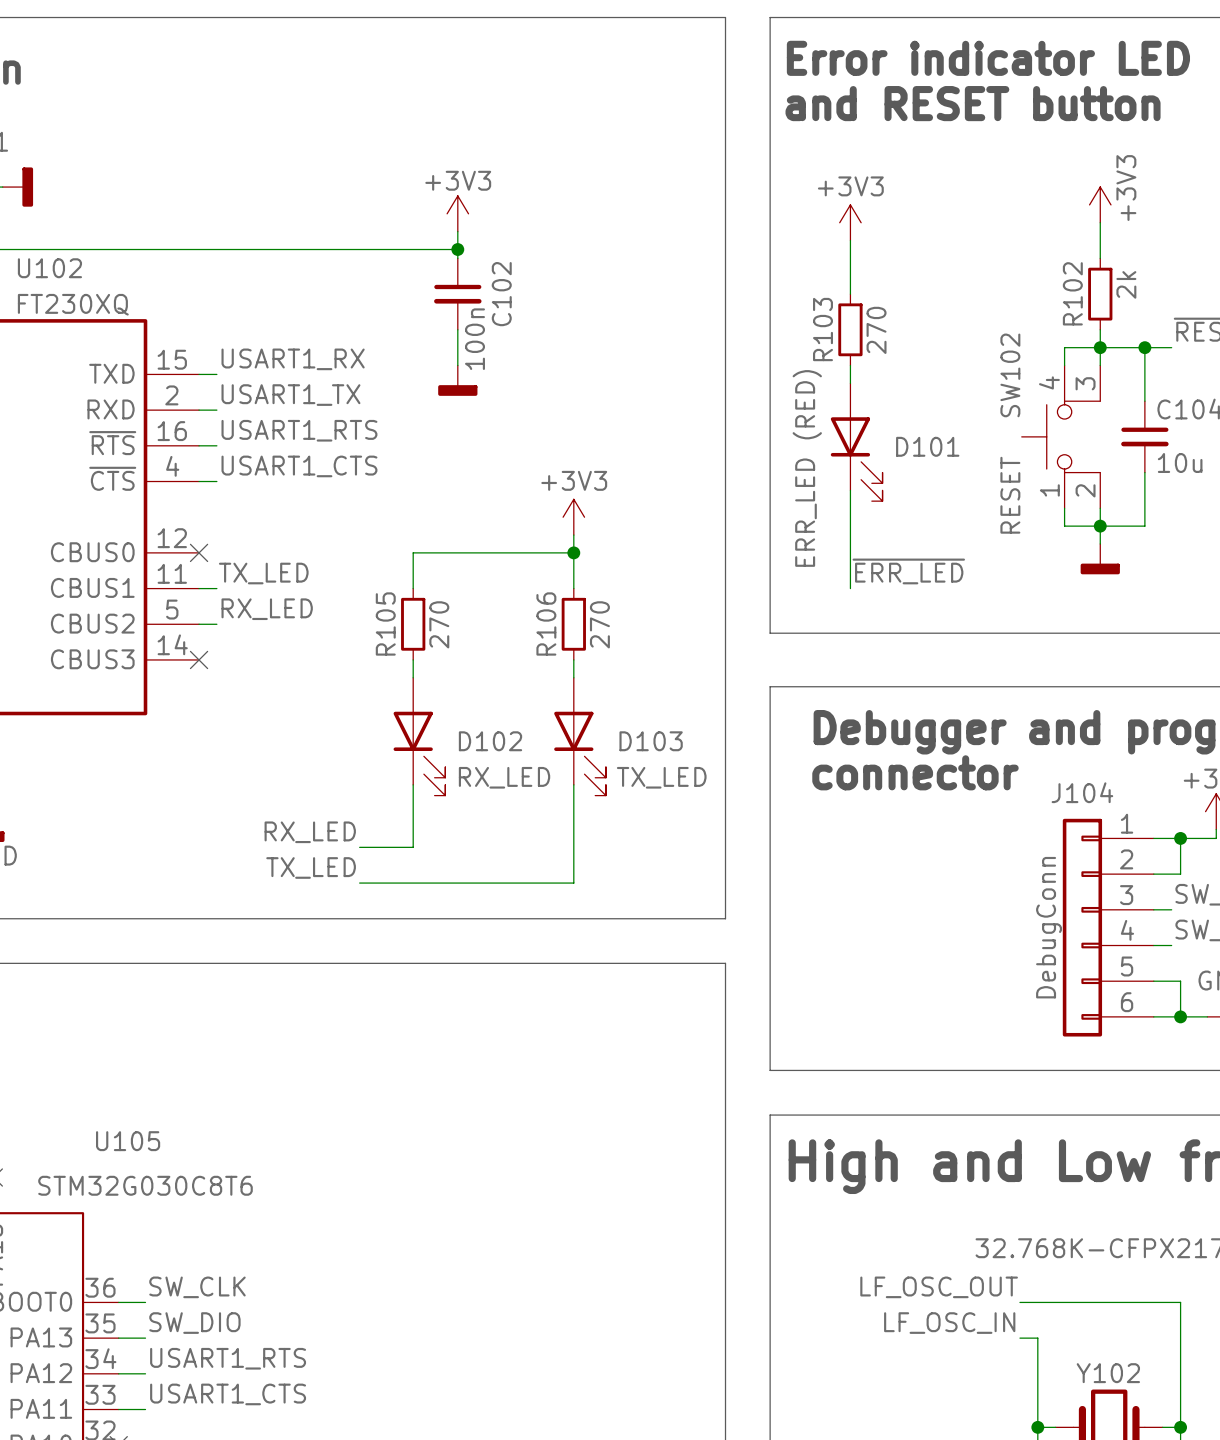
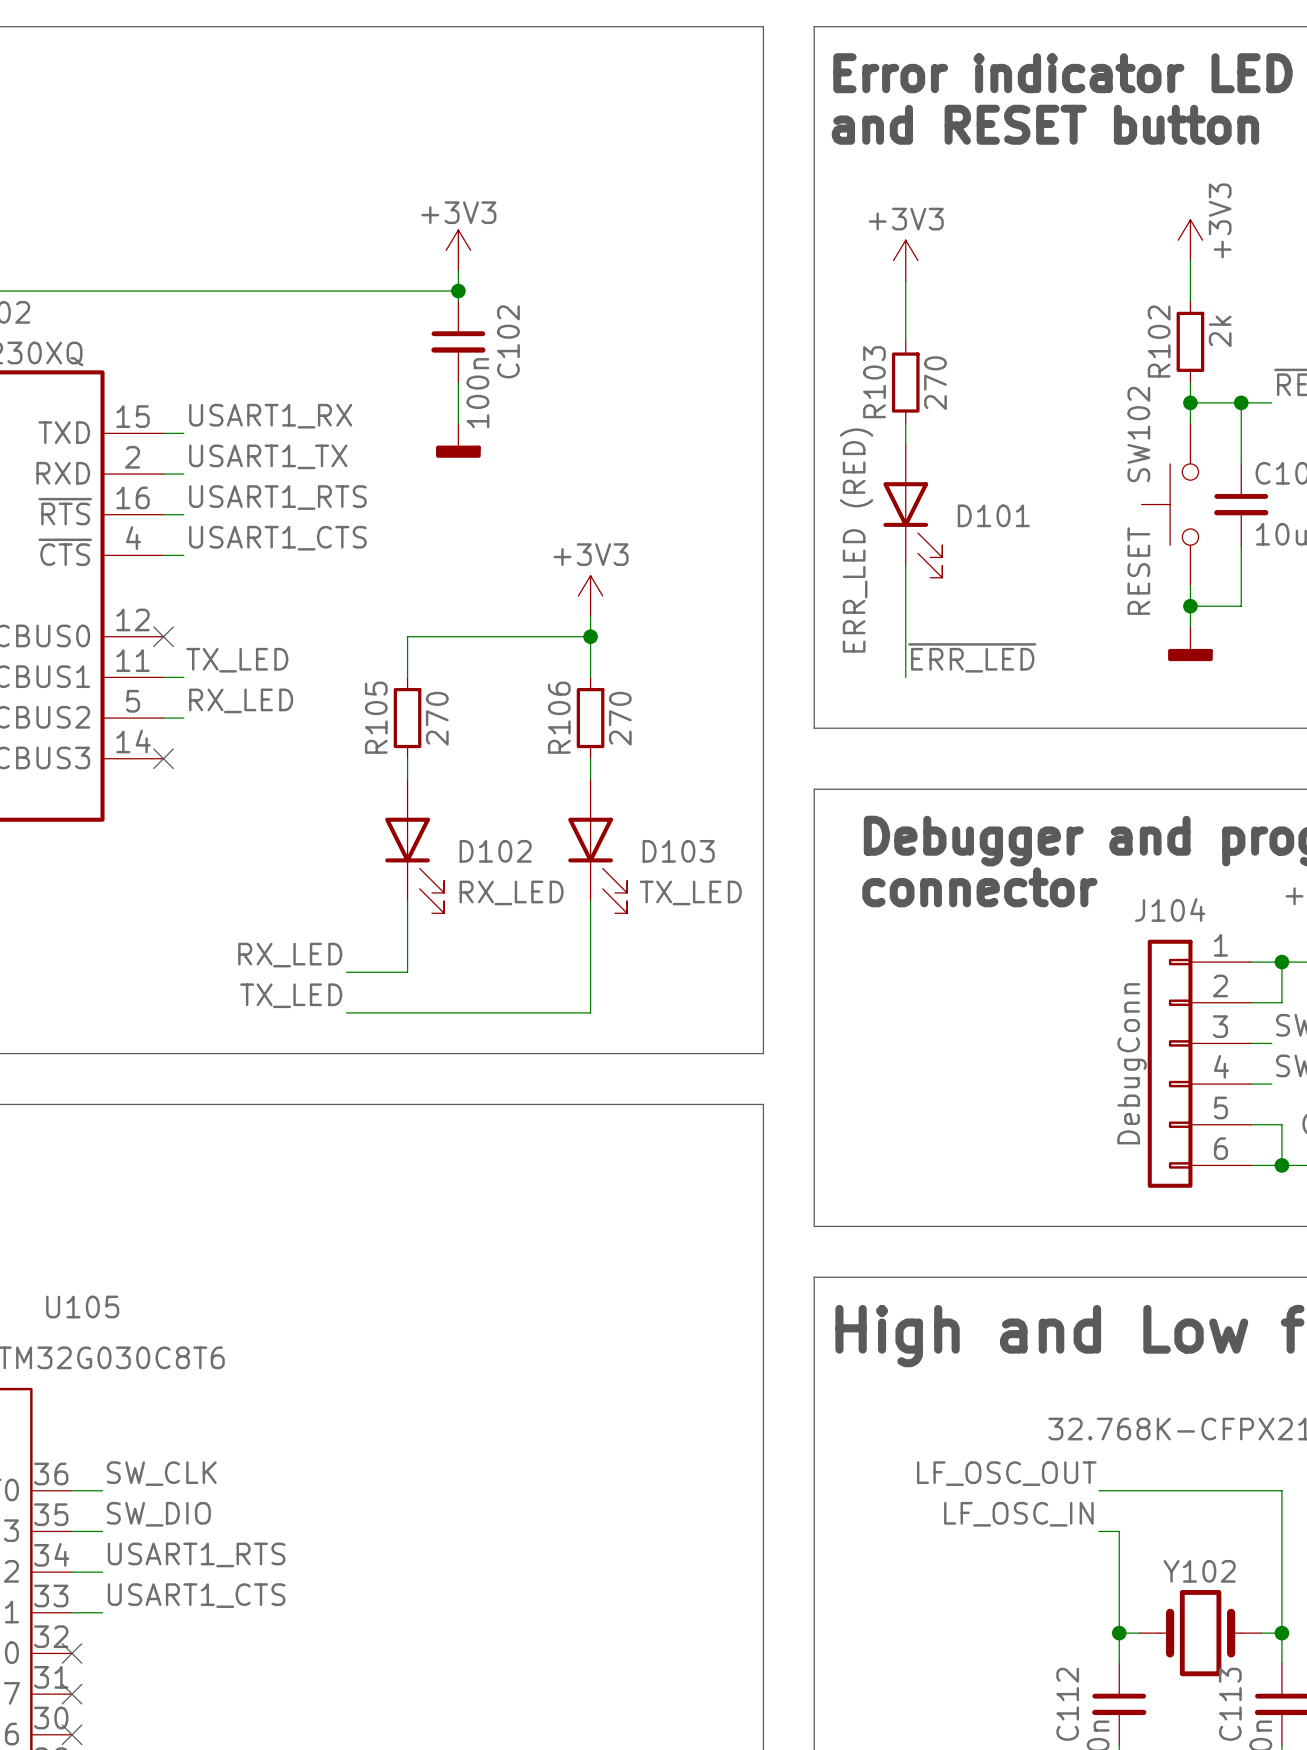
wire: (1100, 347) (1064, 347) (1064, 365) -> none
SW102 symbol: [1021, 365, 1101, 509] -> [1141, 423, 1199, 586]
wire: (1064, 508) (1064, 526) (1100, 526) -> none

